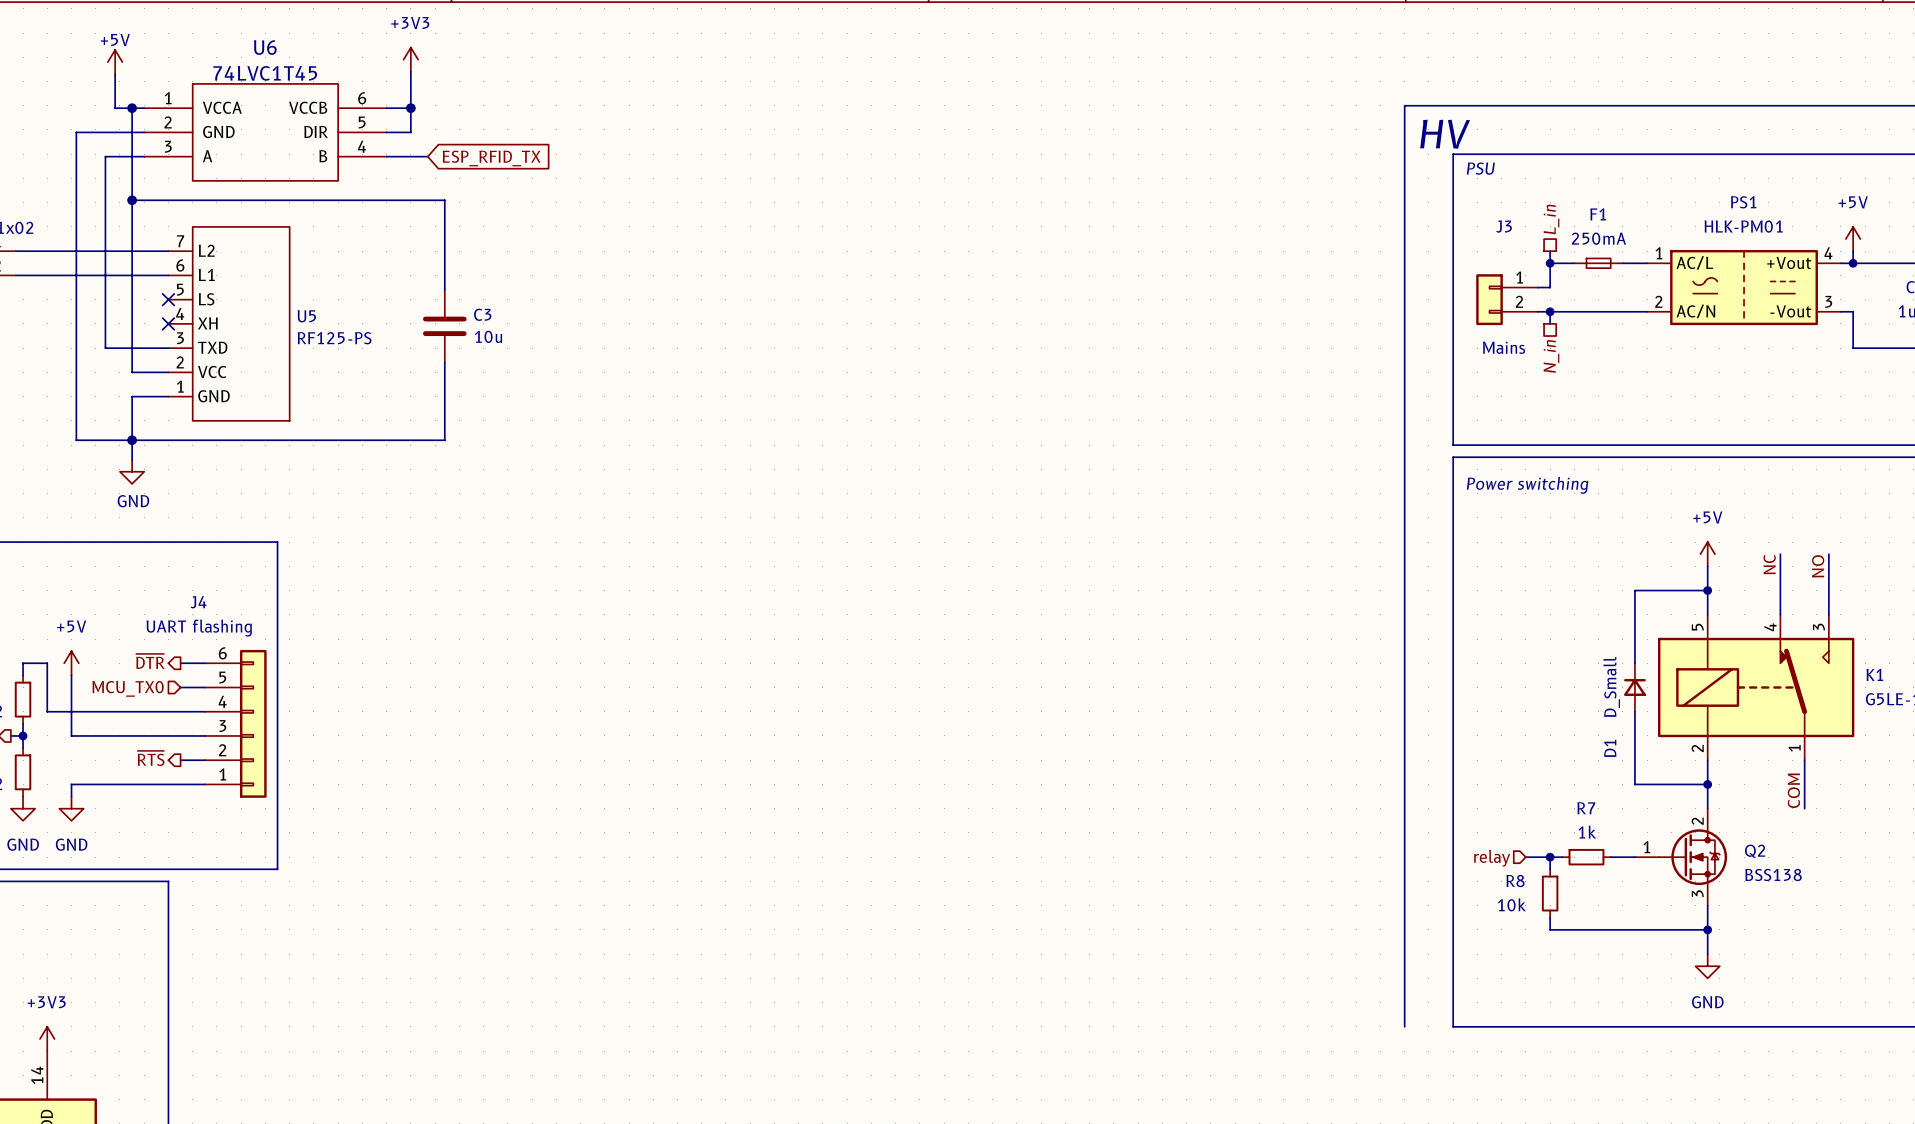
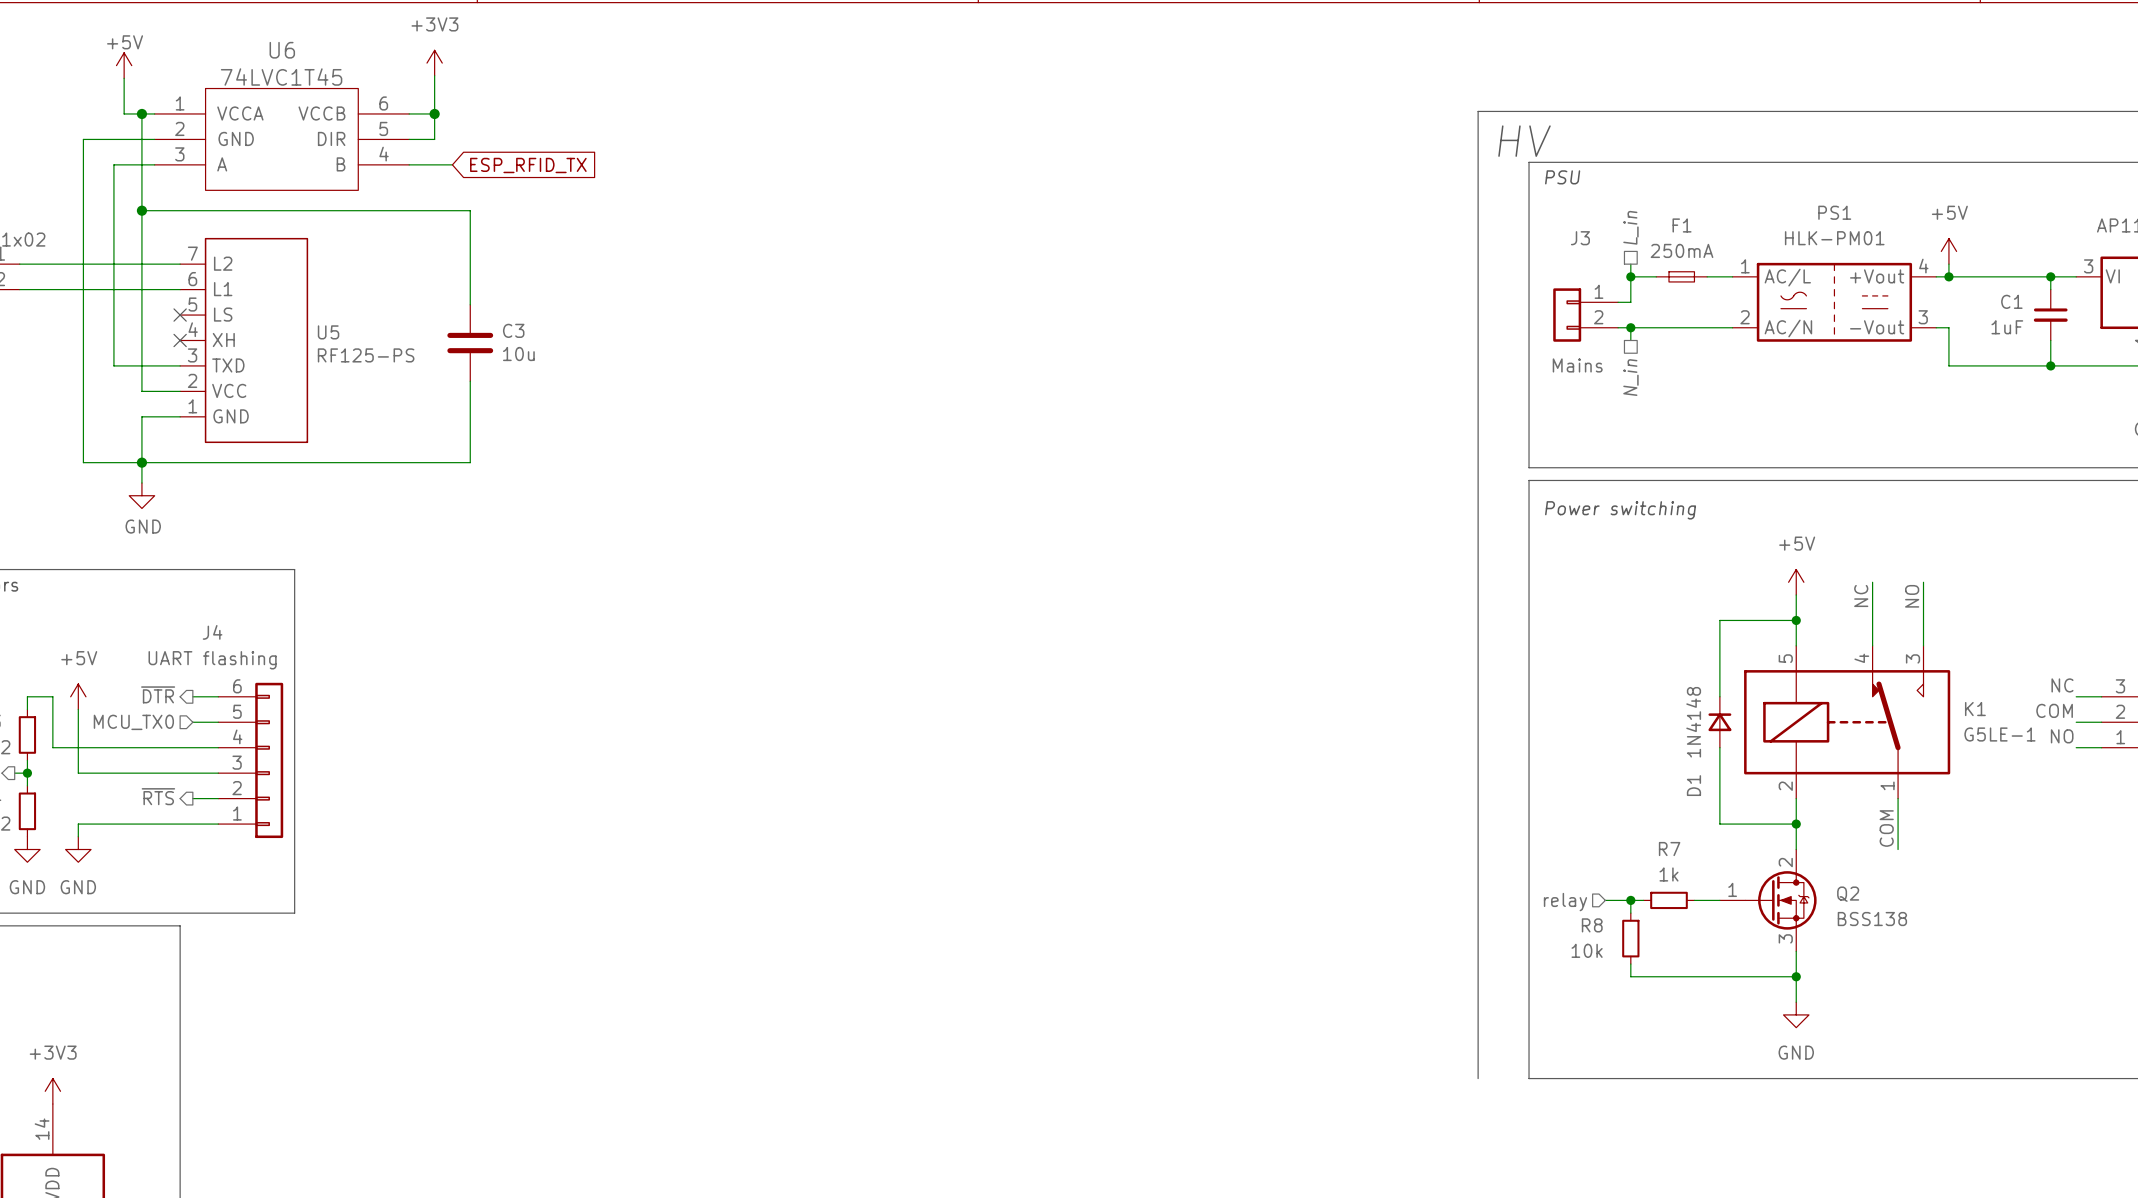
D1 value: D_Small (1611, 686) -> 1N4148 (1693, 722)

